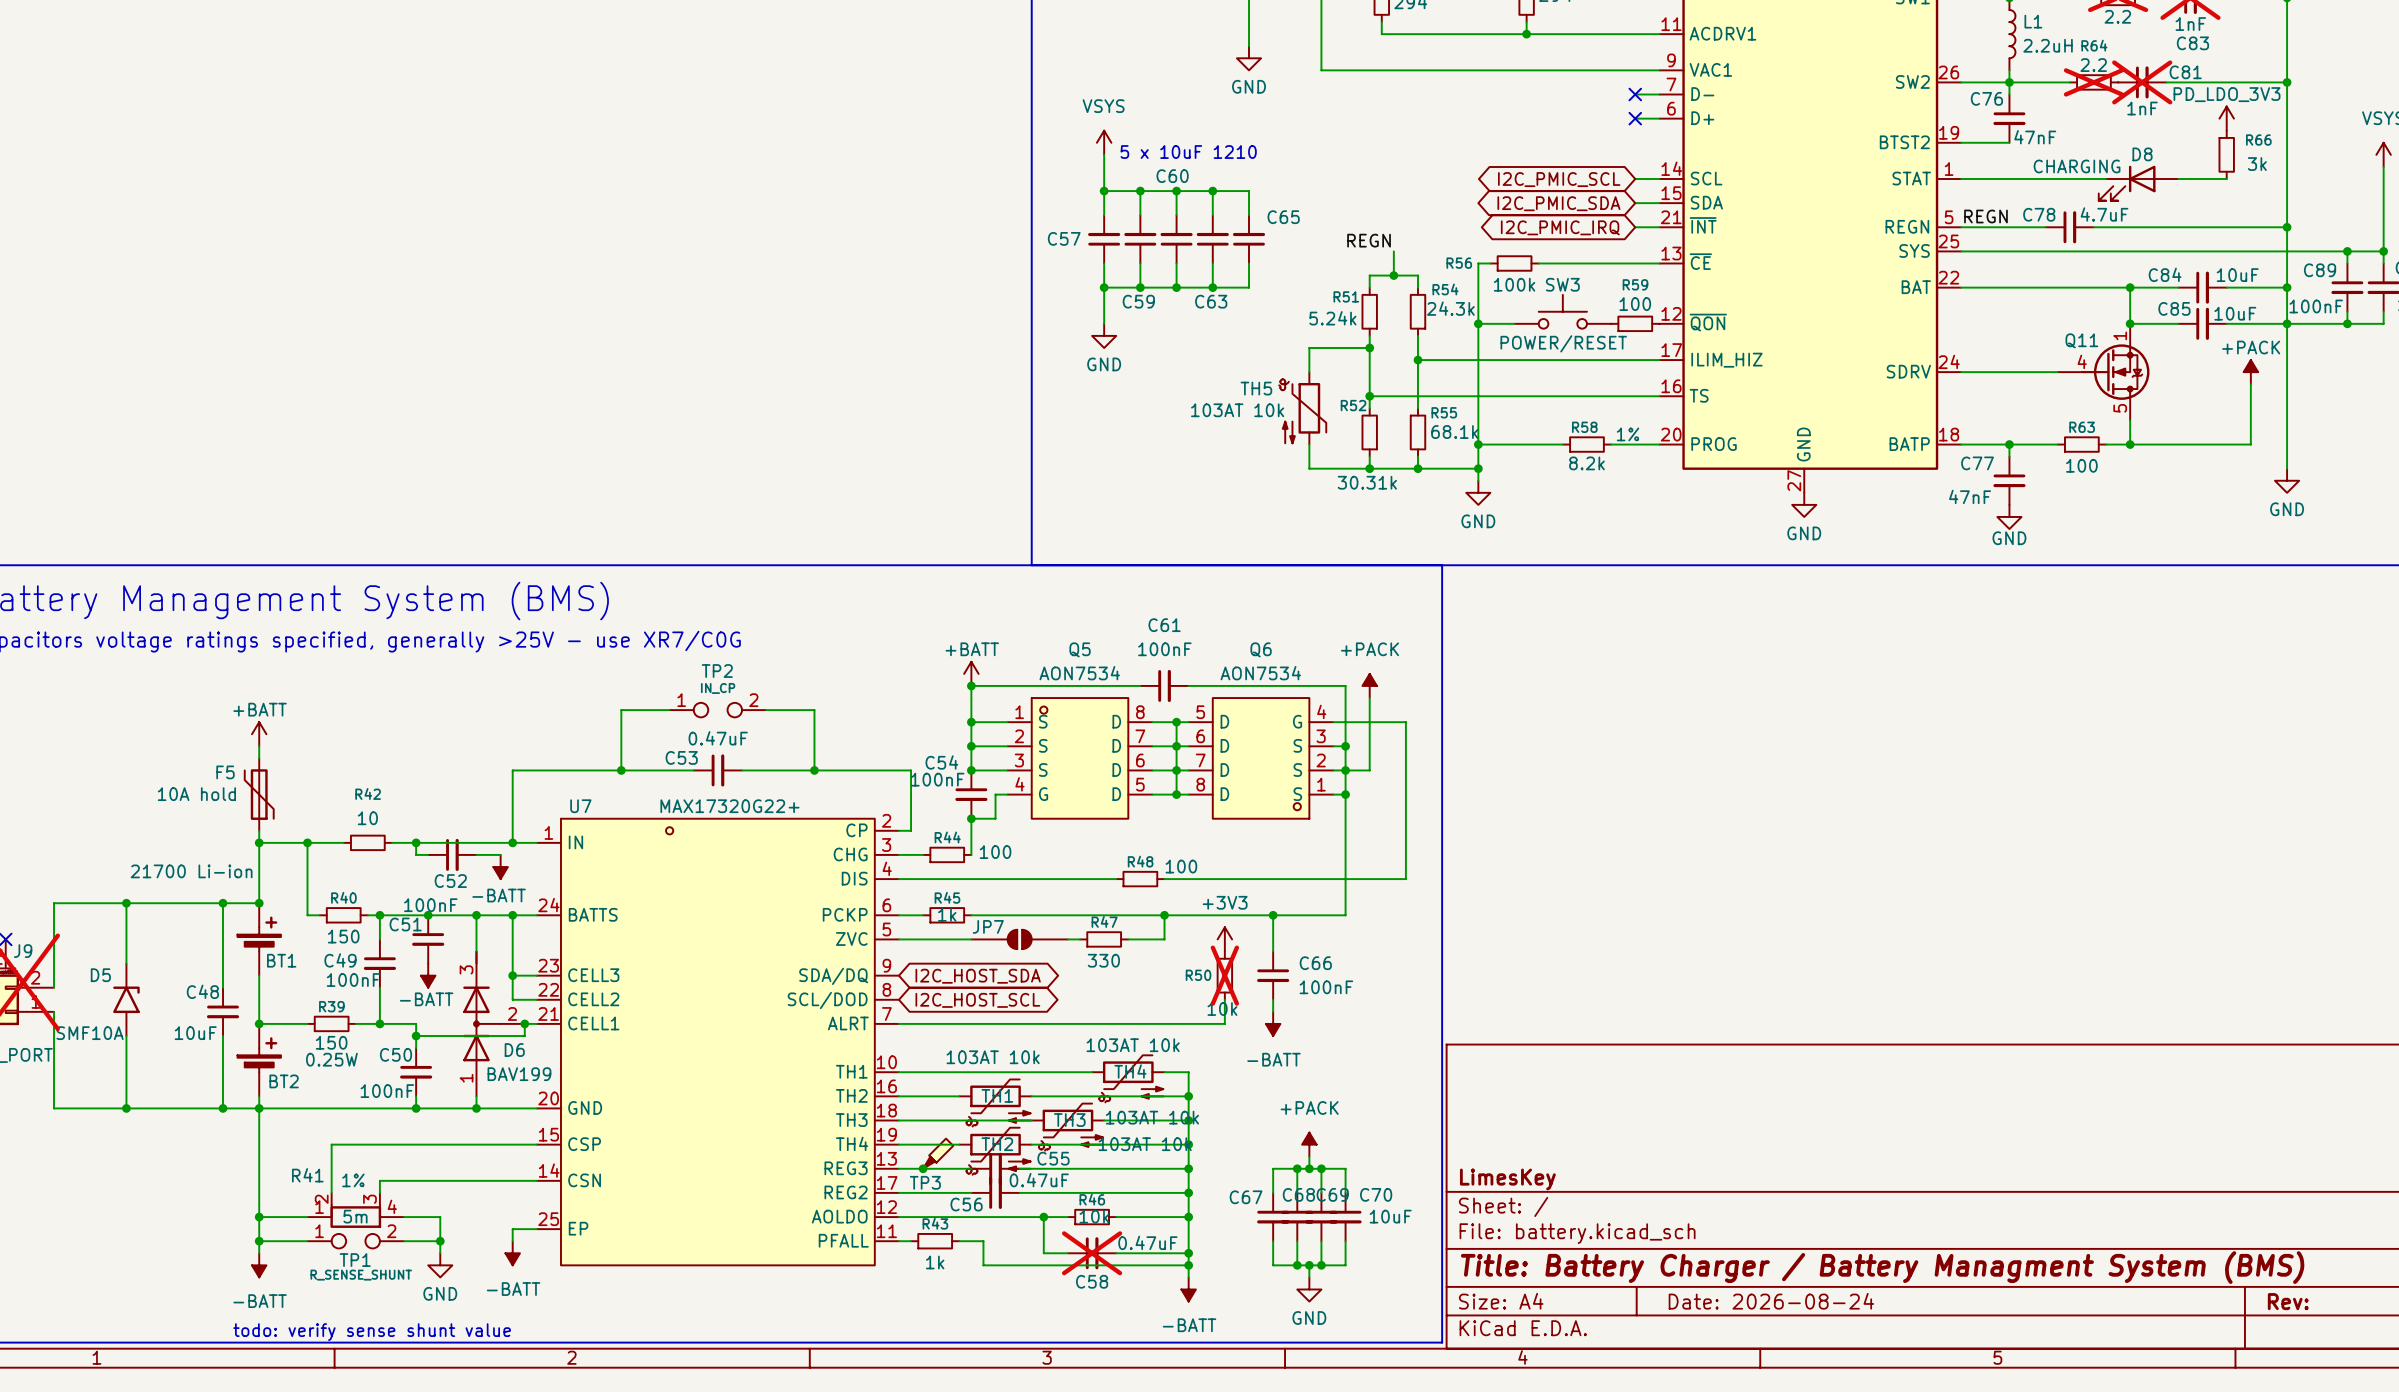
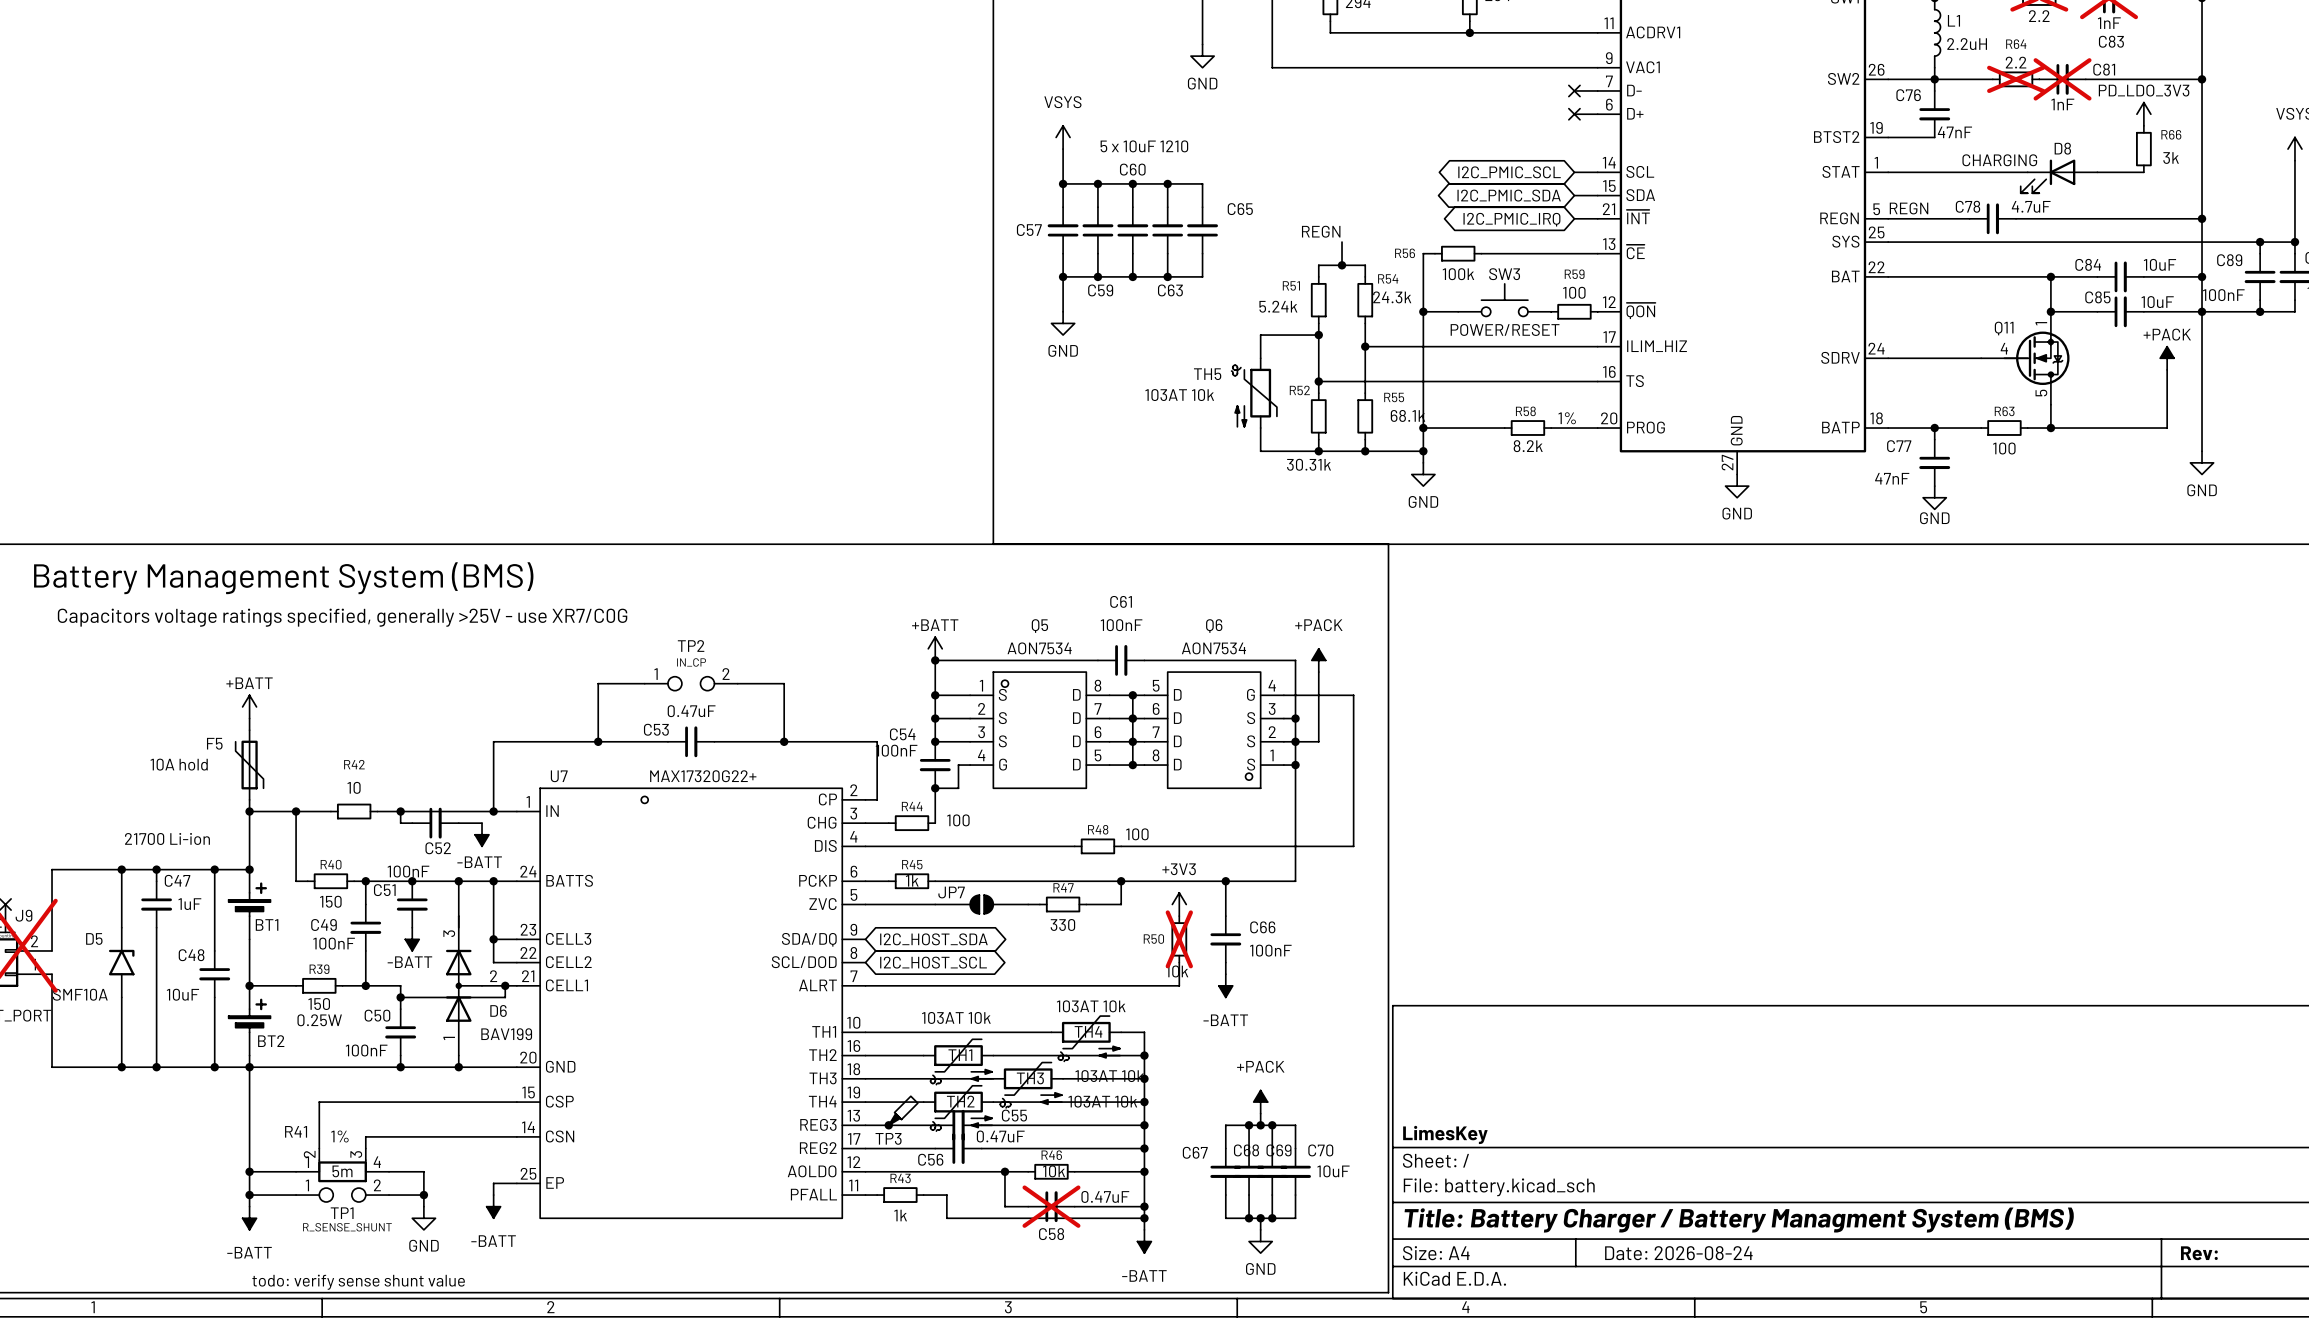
wire: none -> (156, 869) (156, 881)
junction: none -> (156, 869)
C47: none -> 1uF (156, 904)
wire: none -> (156, 927) (156, 1067)
junction: none -> (156, 1067)

